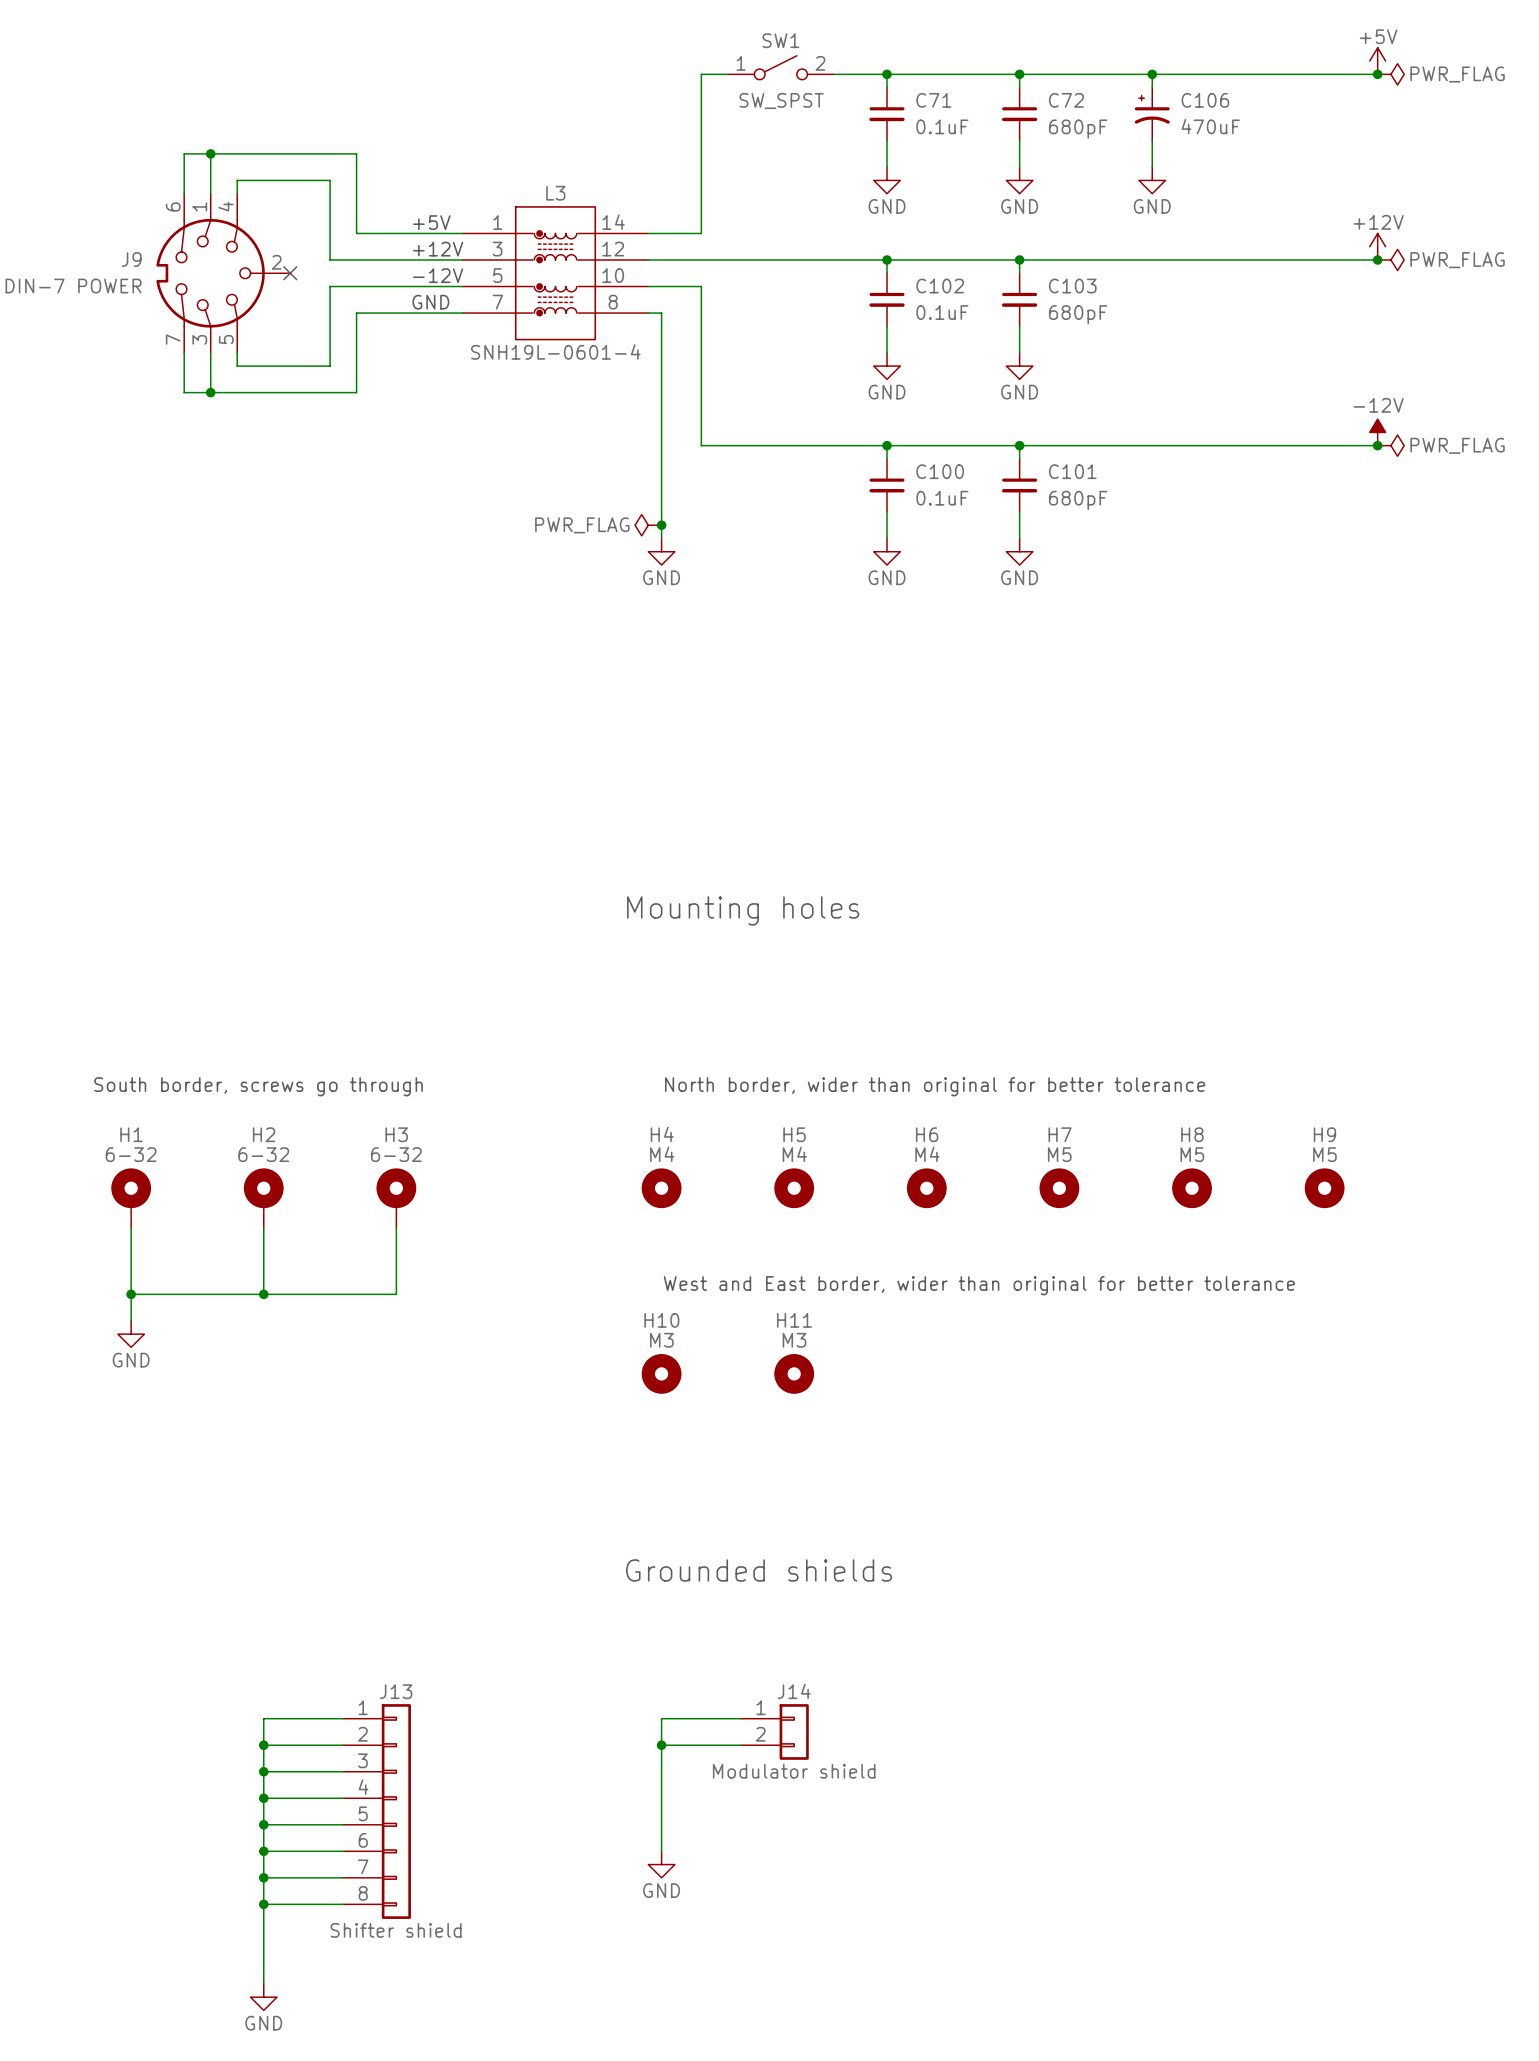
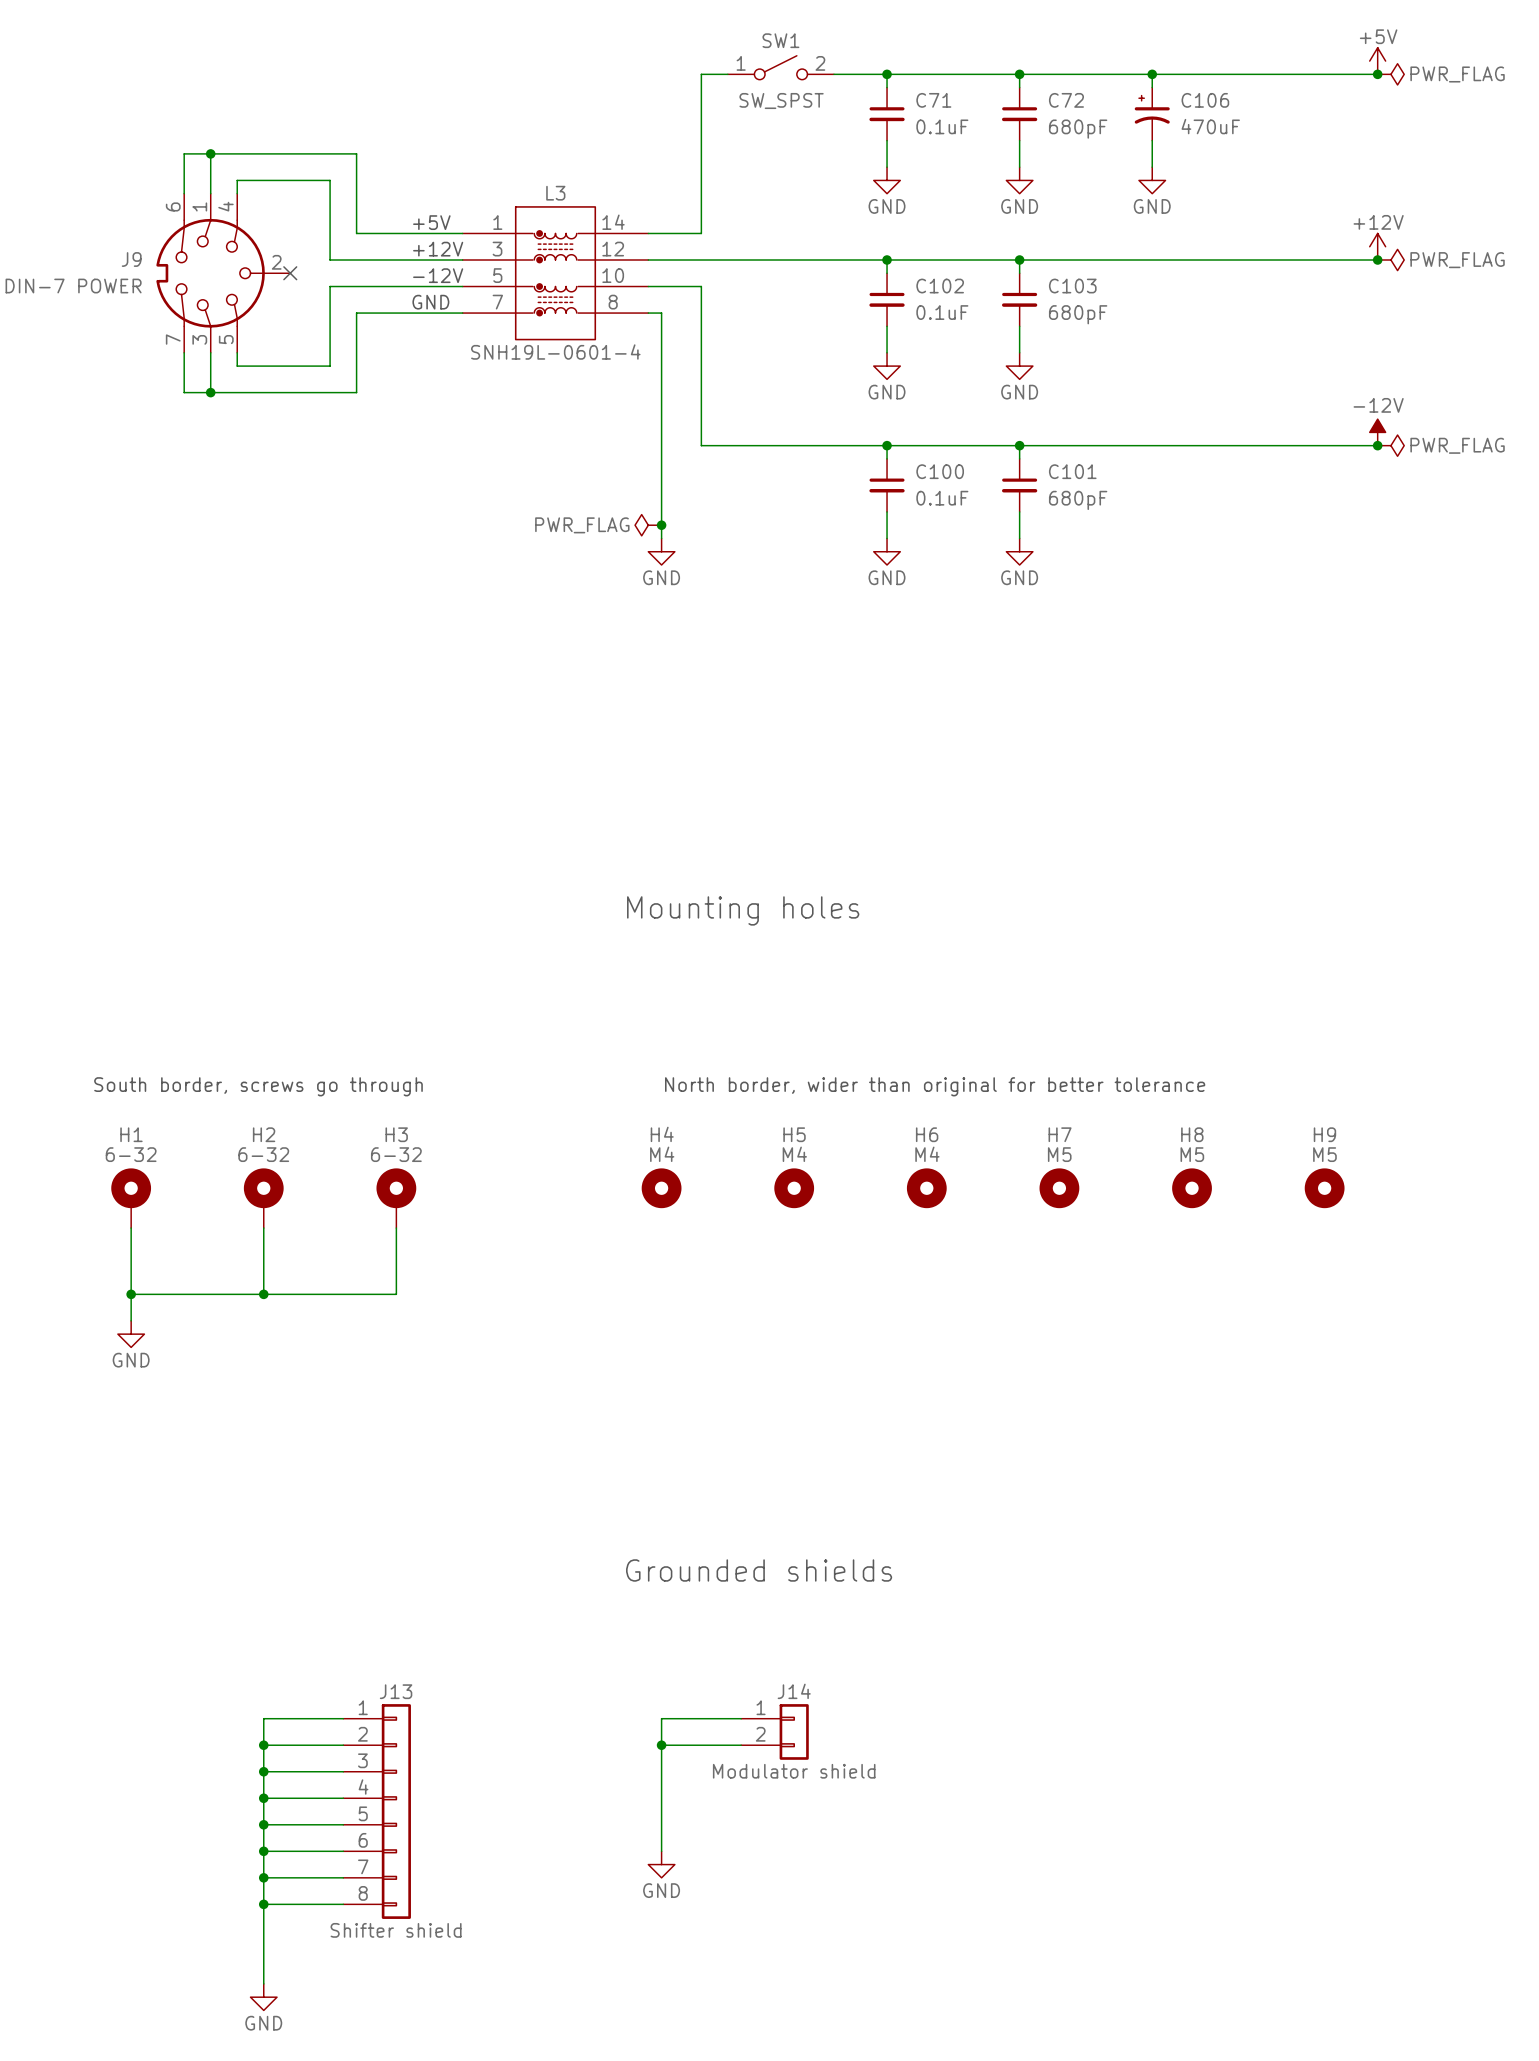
text: West and East border, wider than original for better tolerance (979, 1285) -> none
H10: M3 (661, 1373) -> none
H11: M3 (794, 1373) -> none

